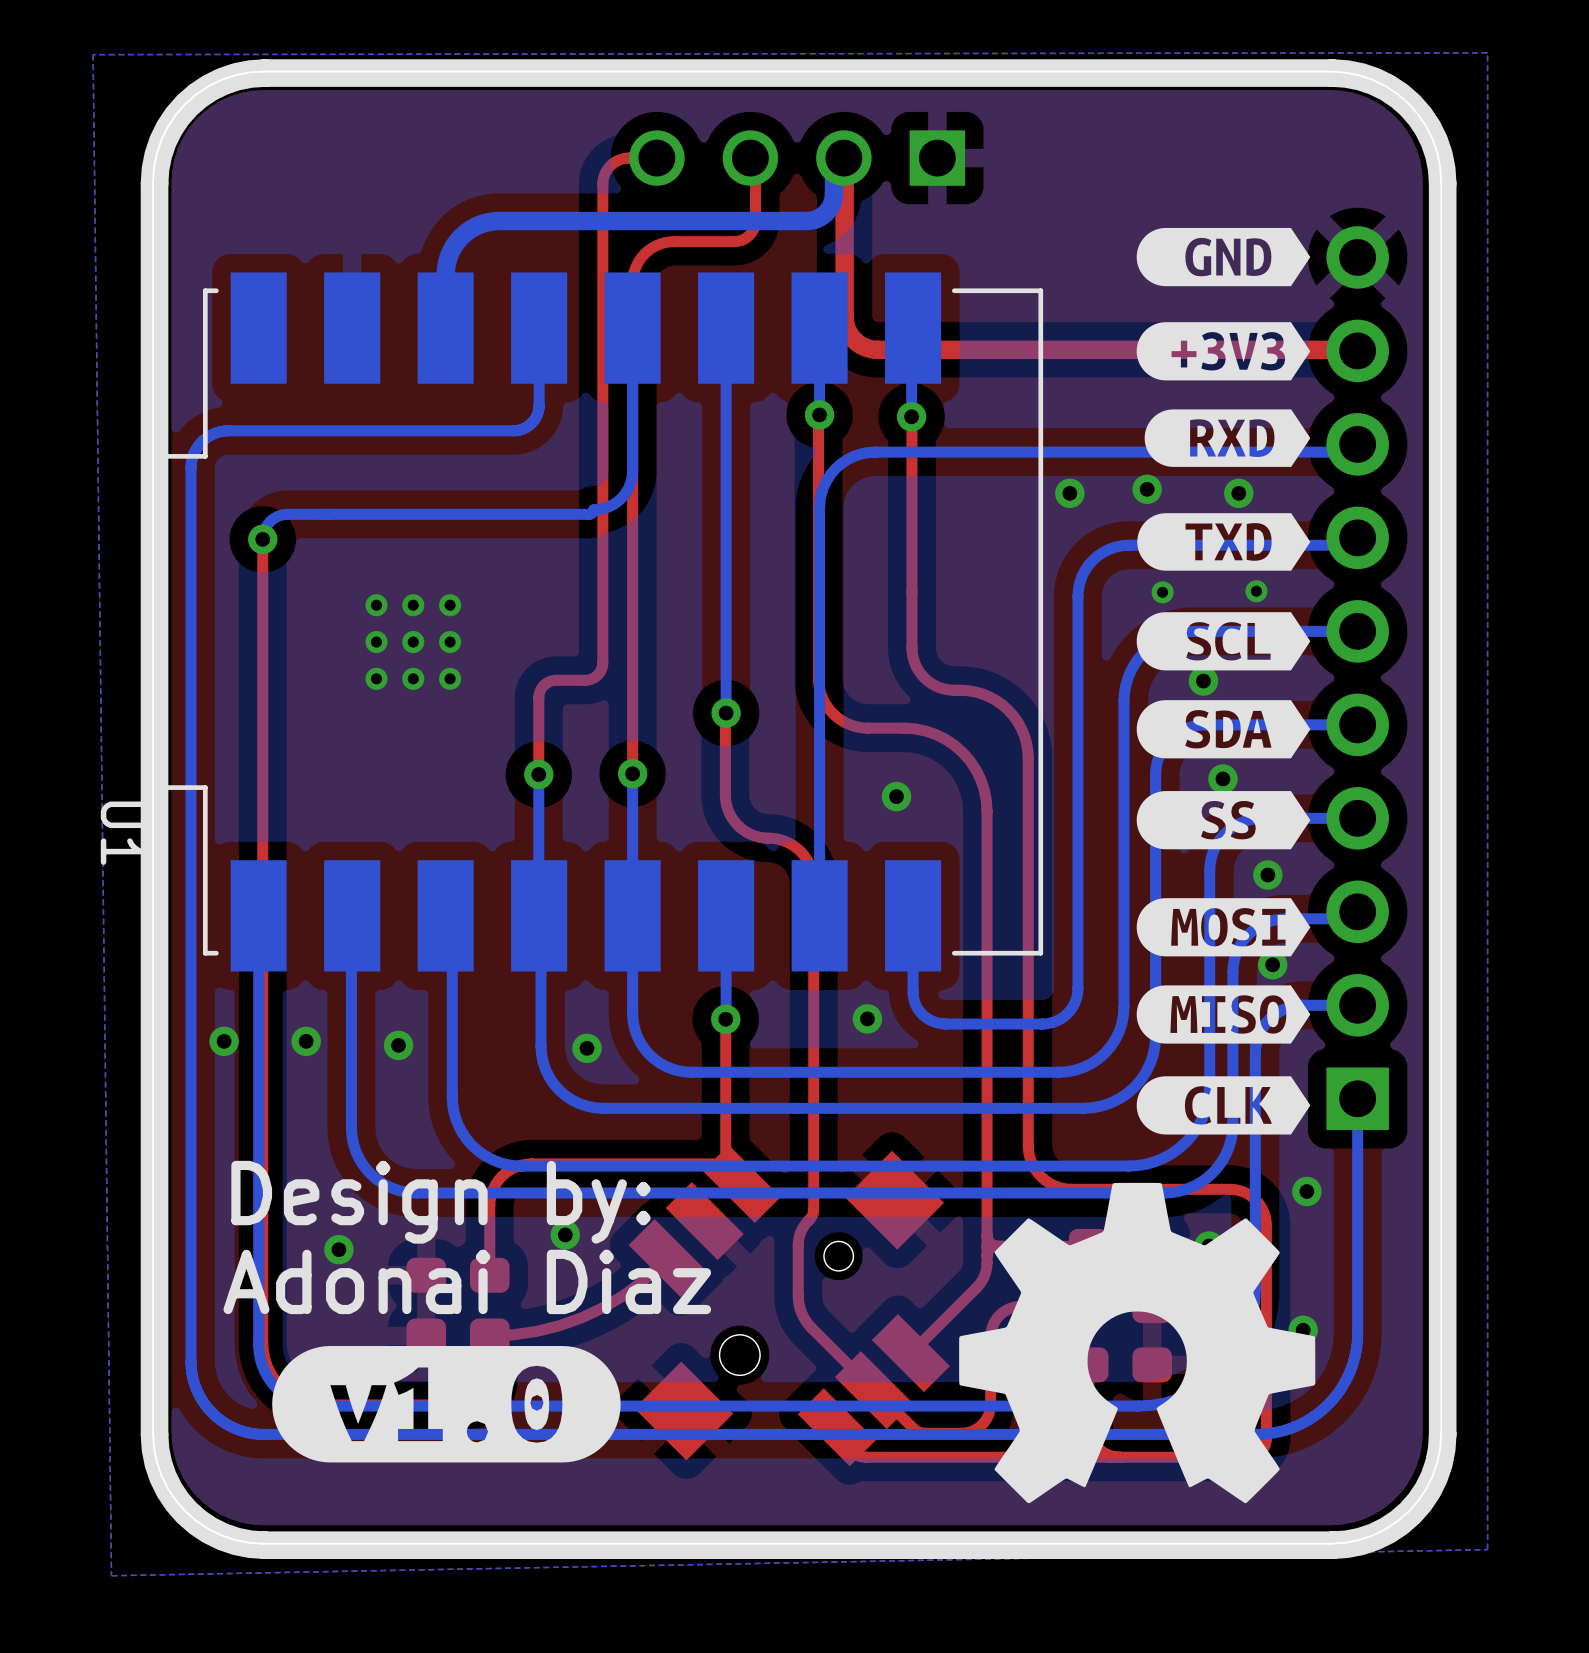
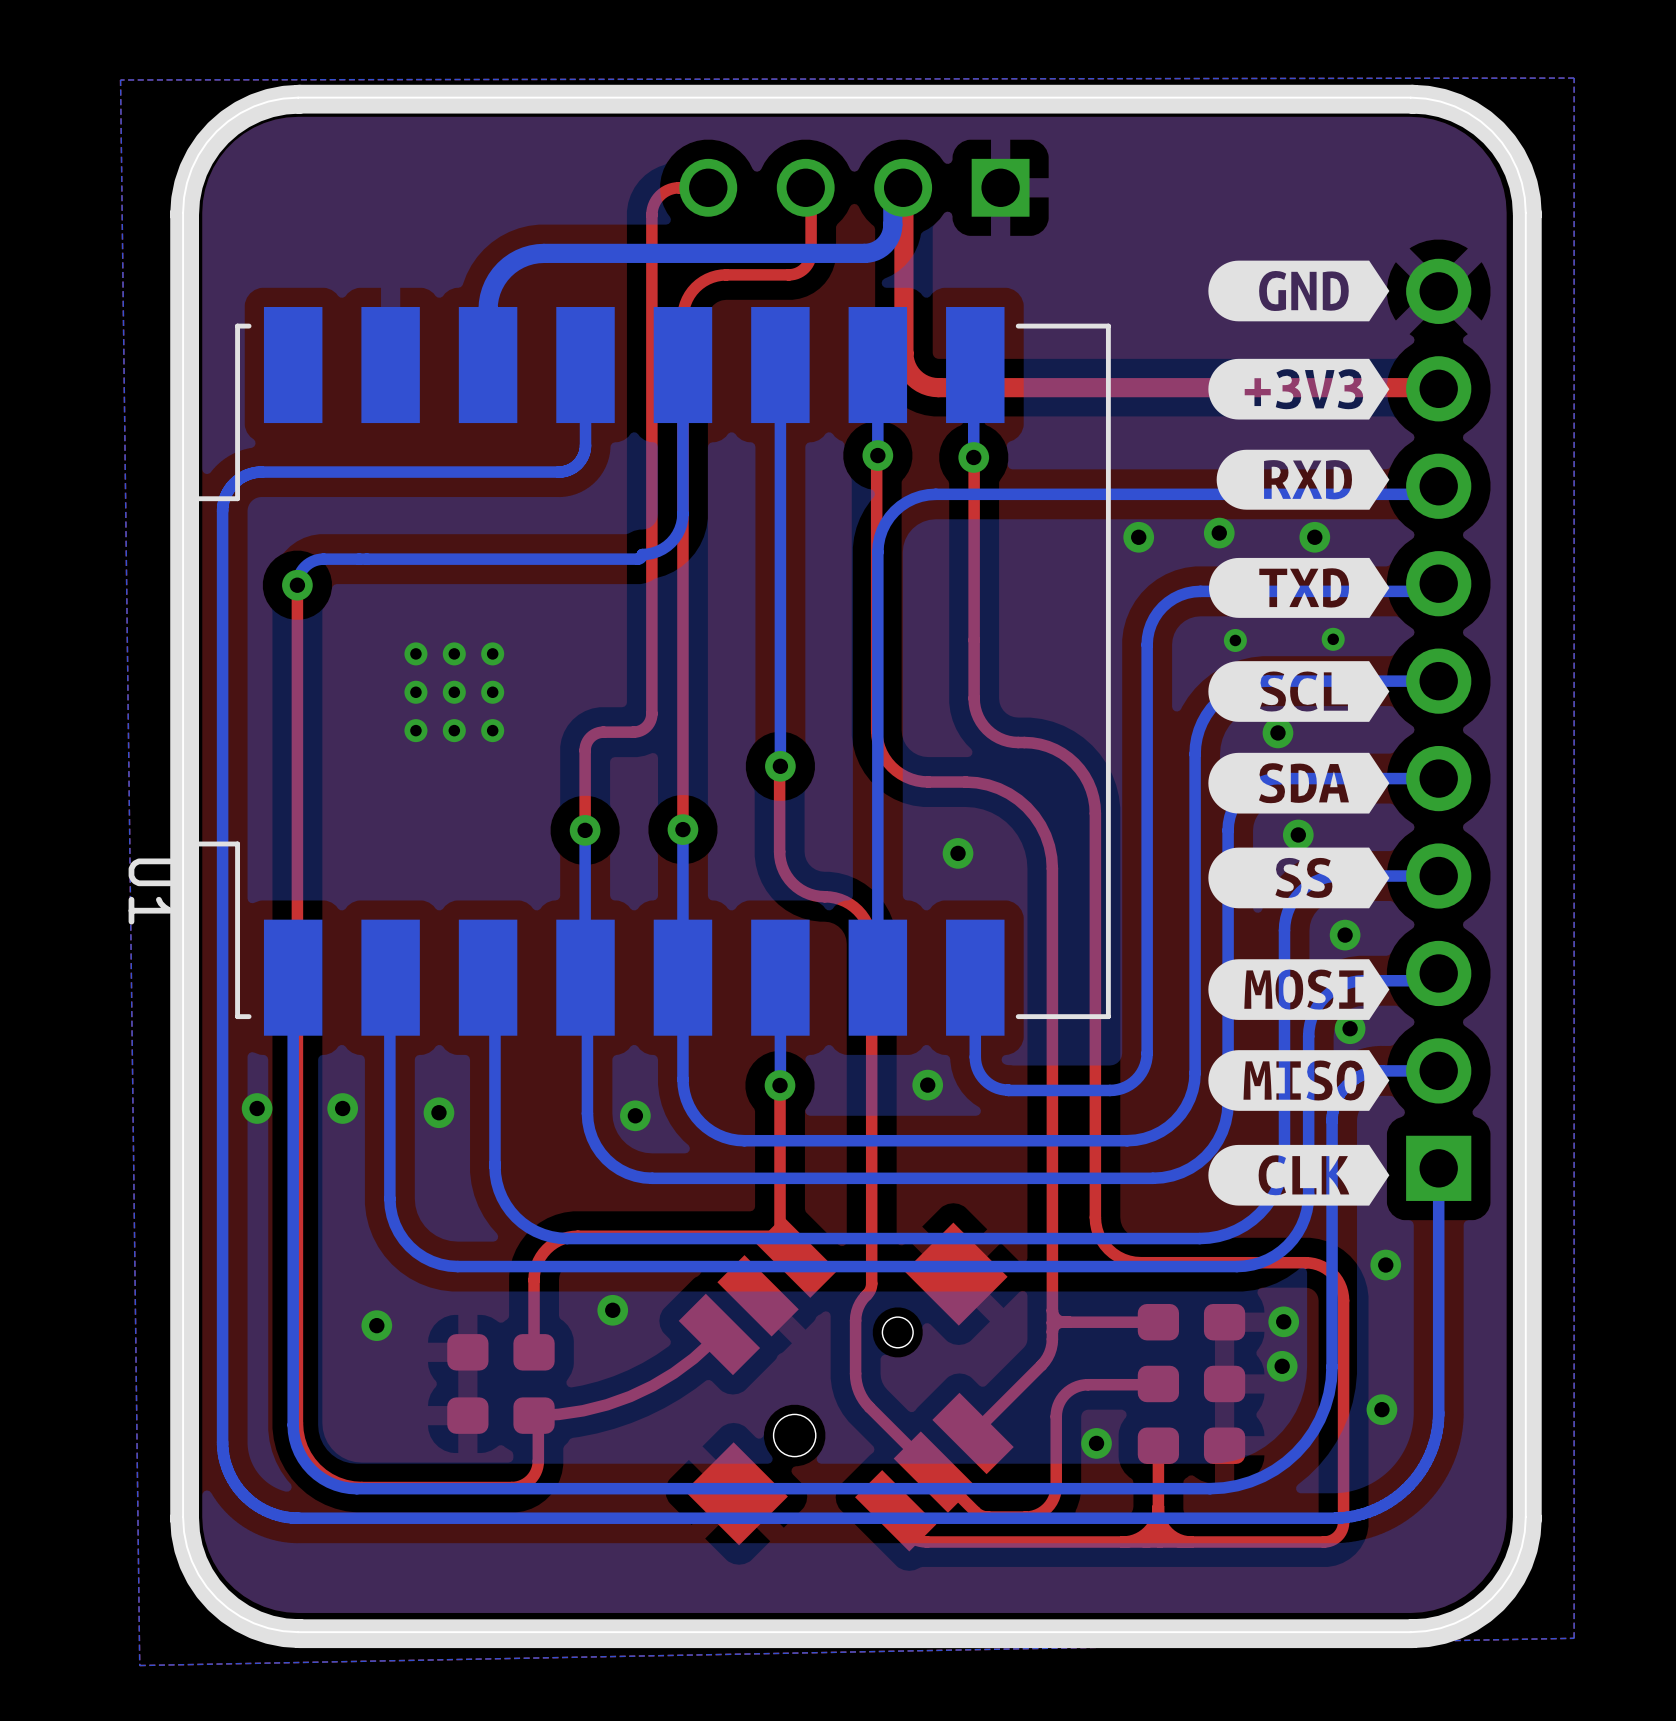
drawing: [959, 1182, 1316, 1504] -> none
text: Design by: (441, 1202) -> none
text: Adonai Diaz (467, 1281) -> none
drawing: [272, 1346, 621, 1463] -> none

